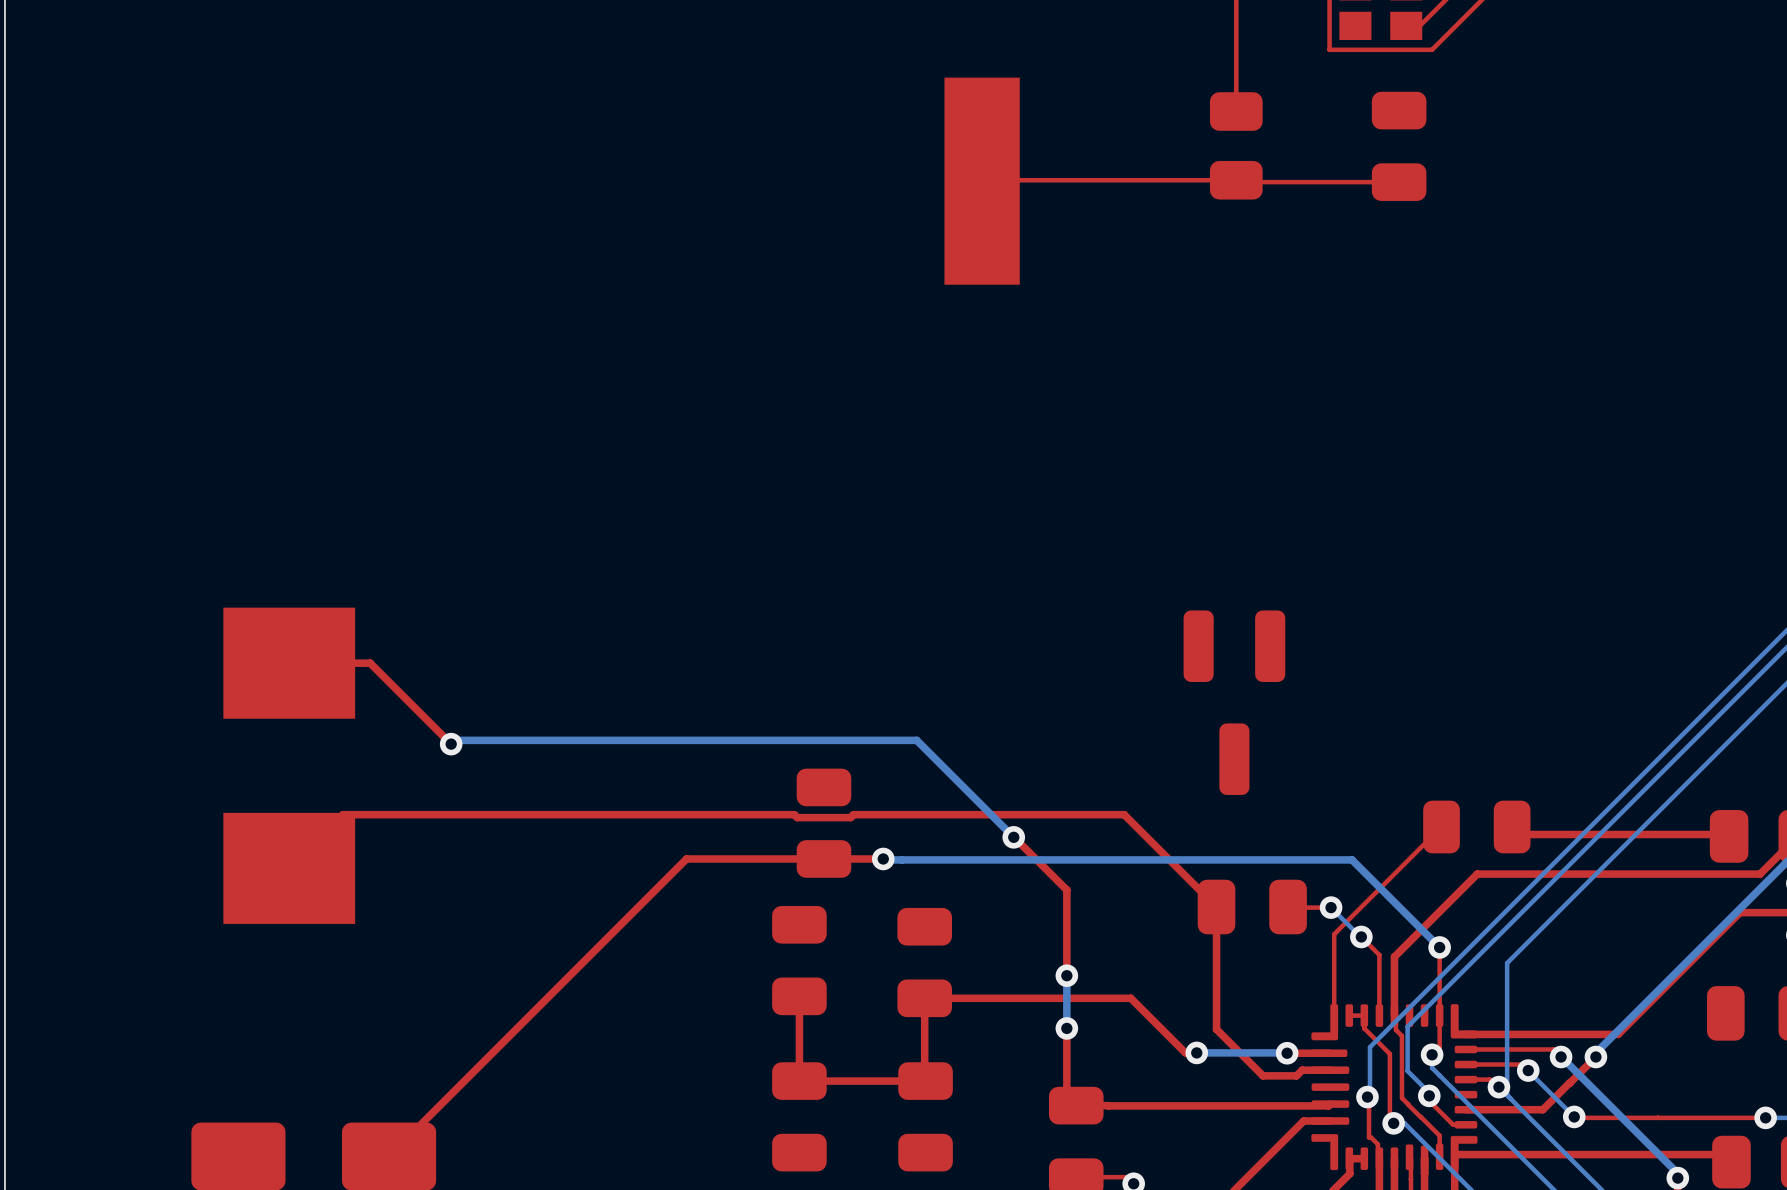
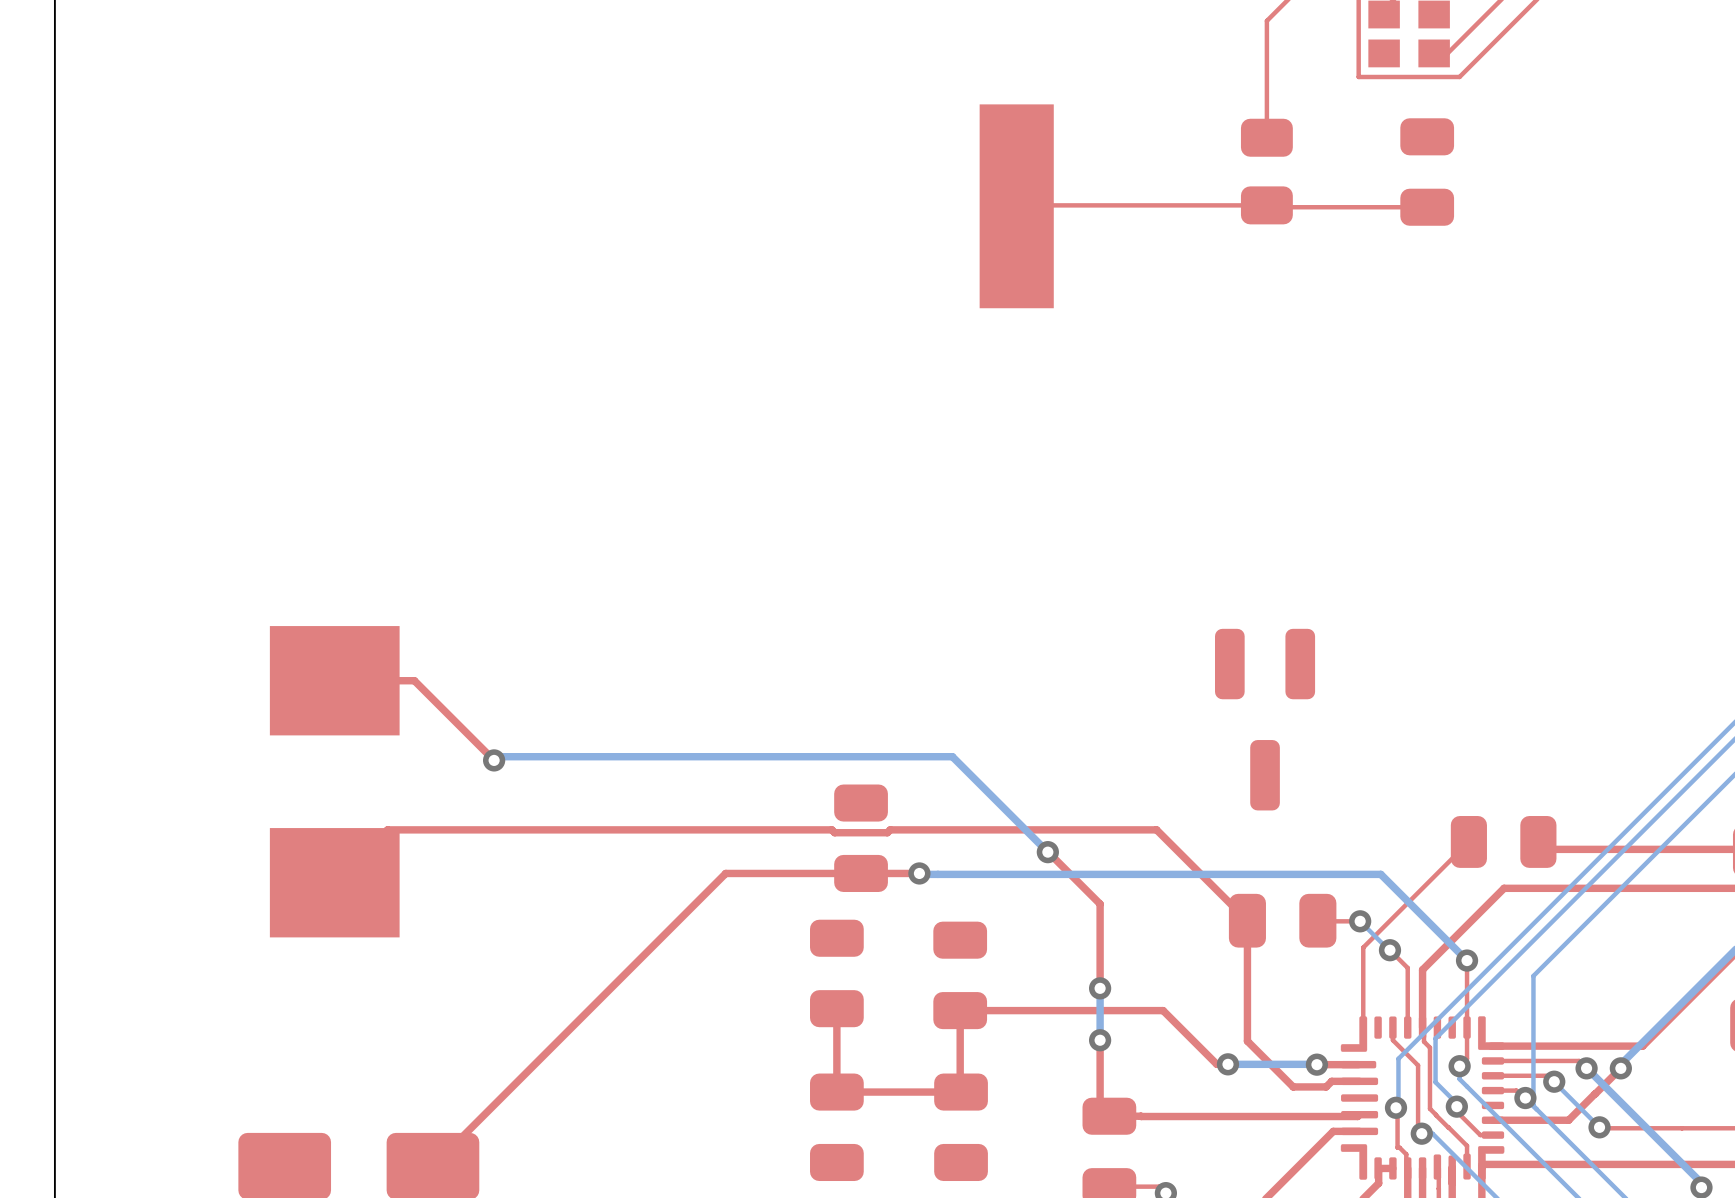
top track: (1364, 1015) (1349, 1015) -> none

